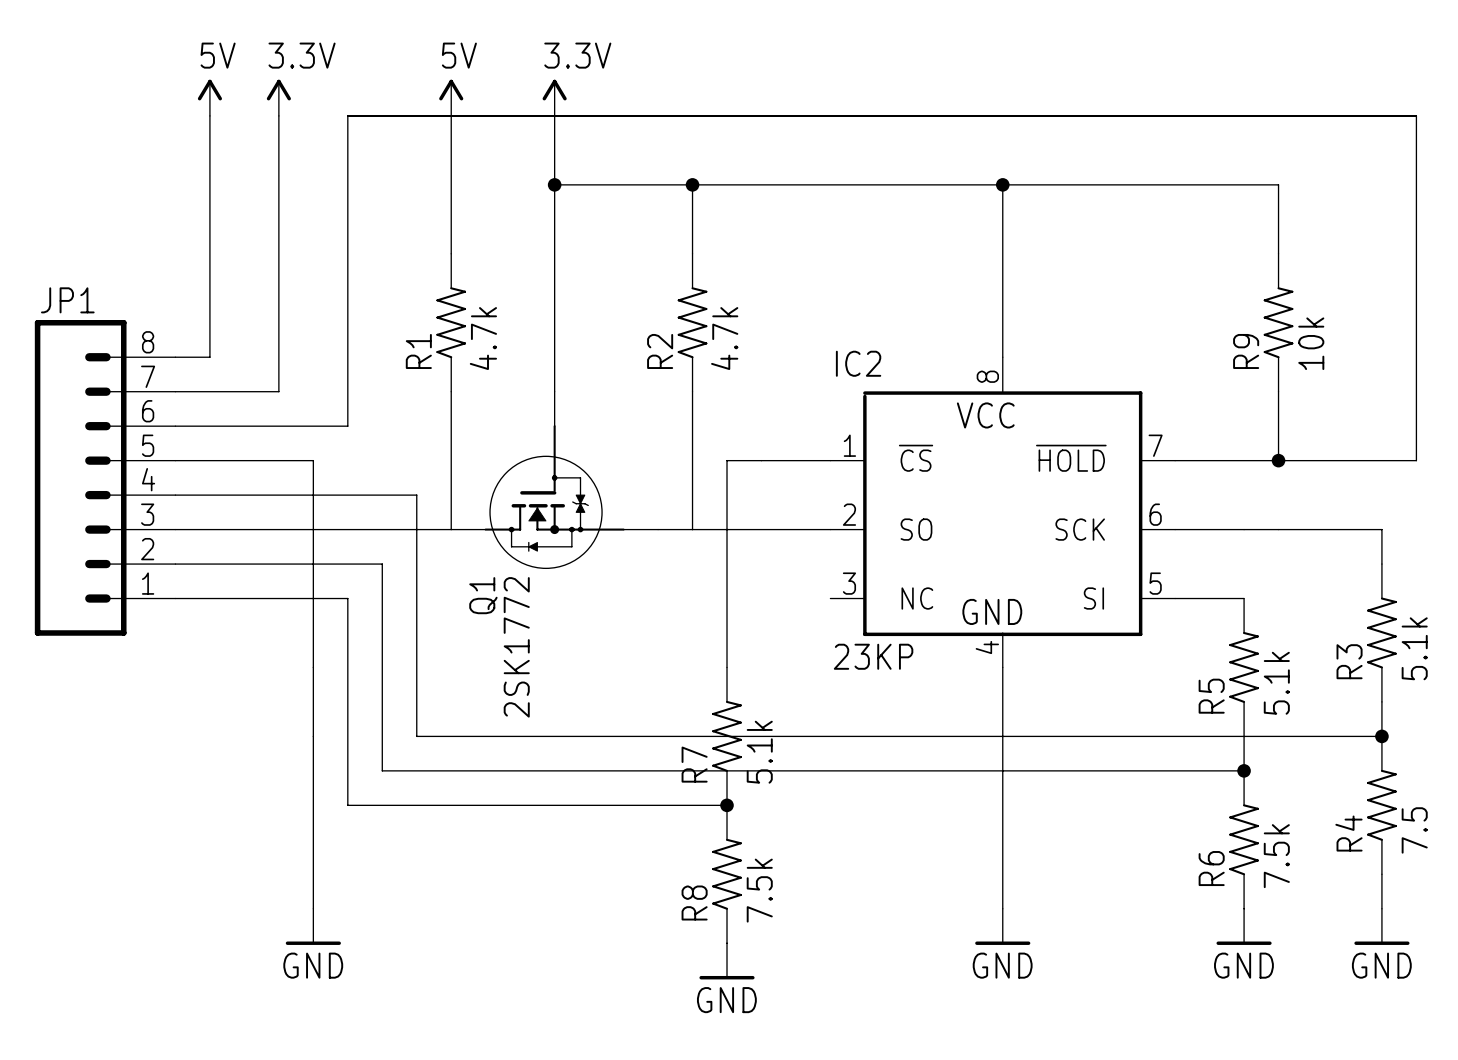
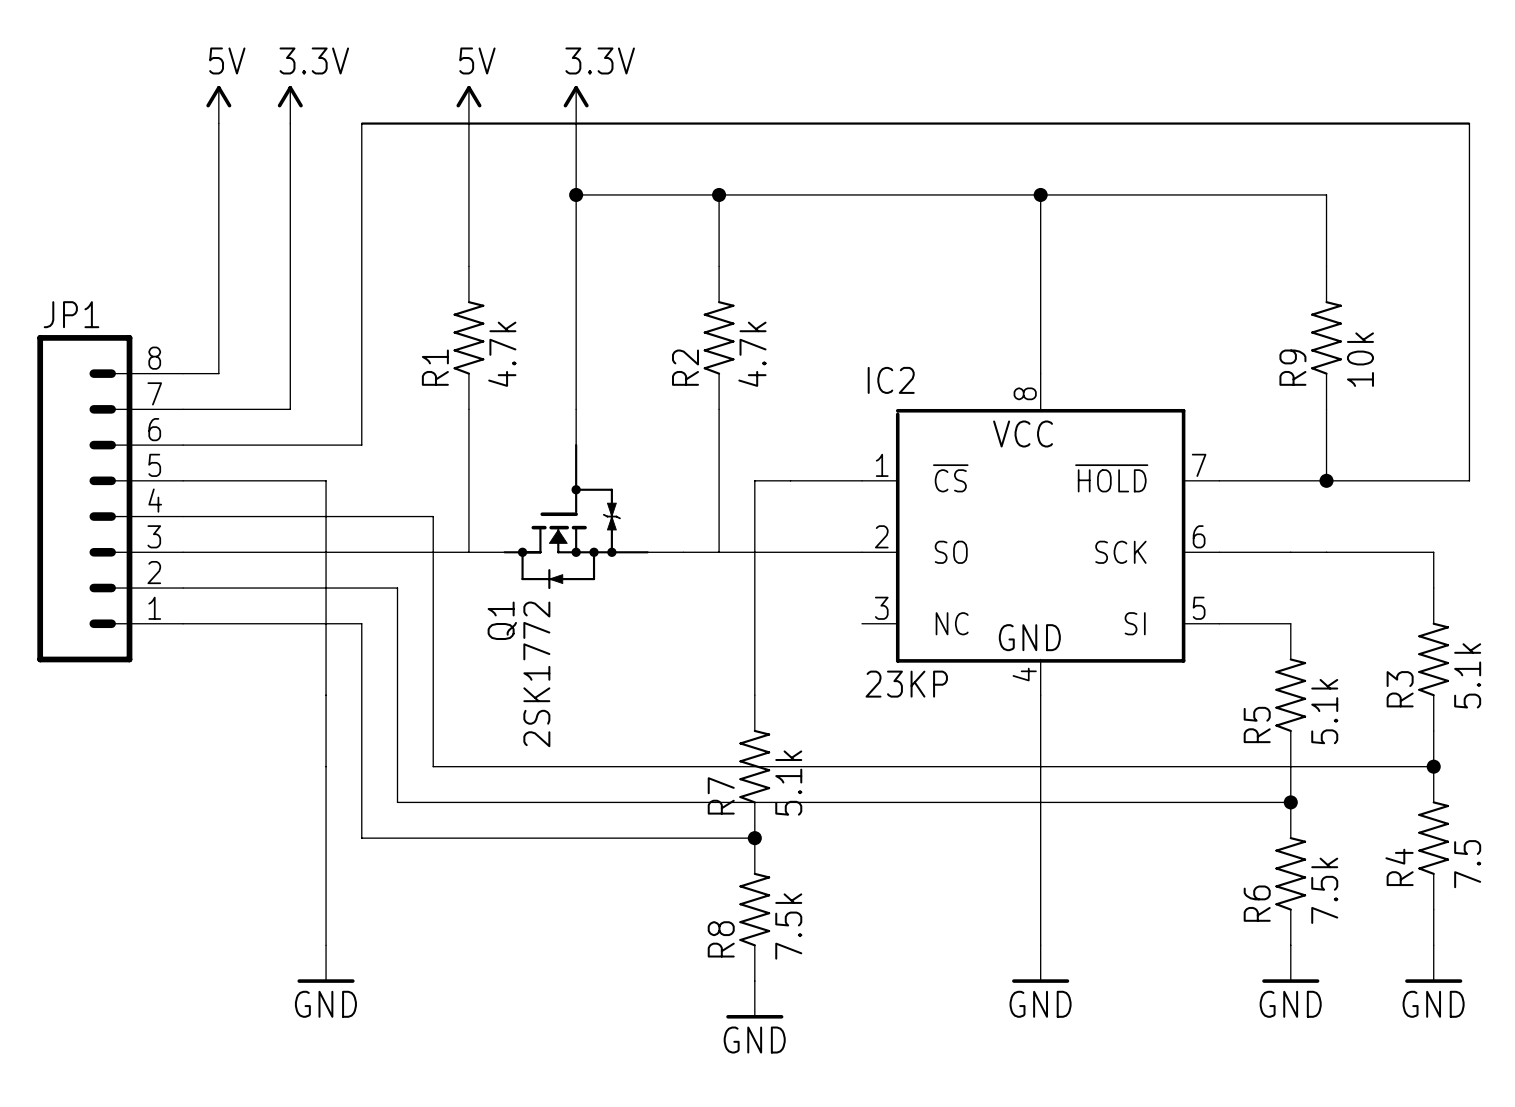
Q1 symbol: [451, 391, 659, 569] -> [468, 409, 684, 590]

